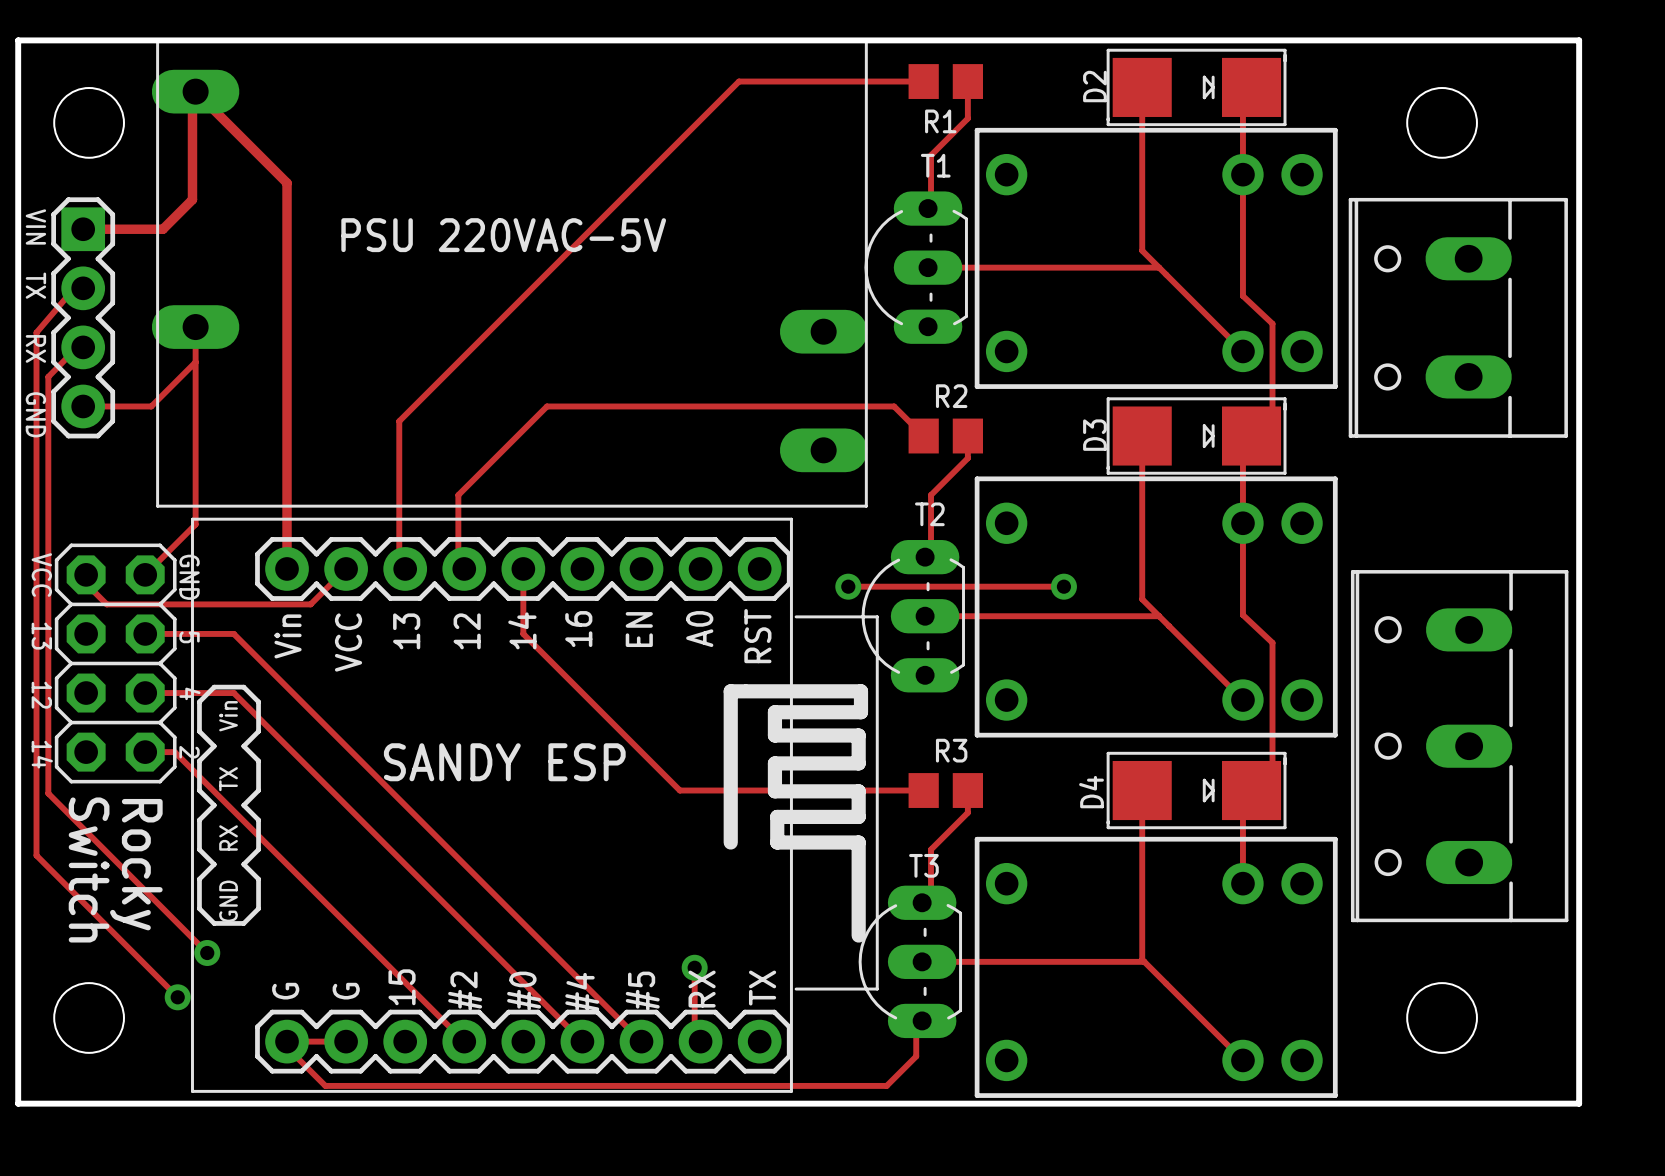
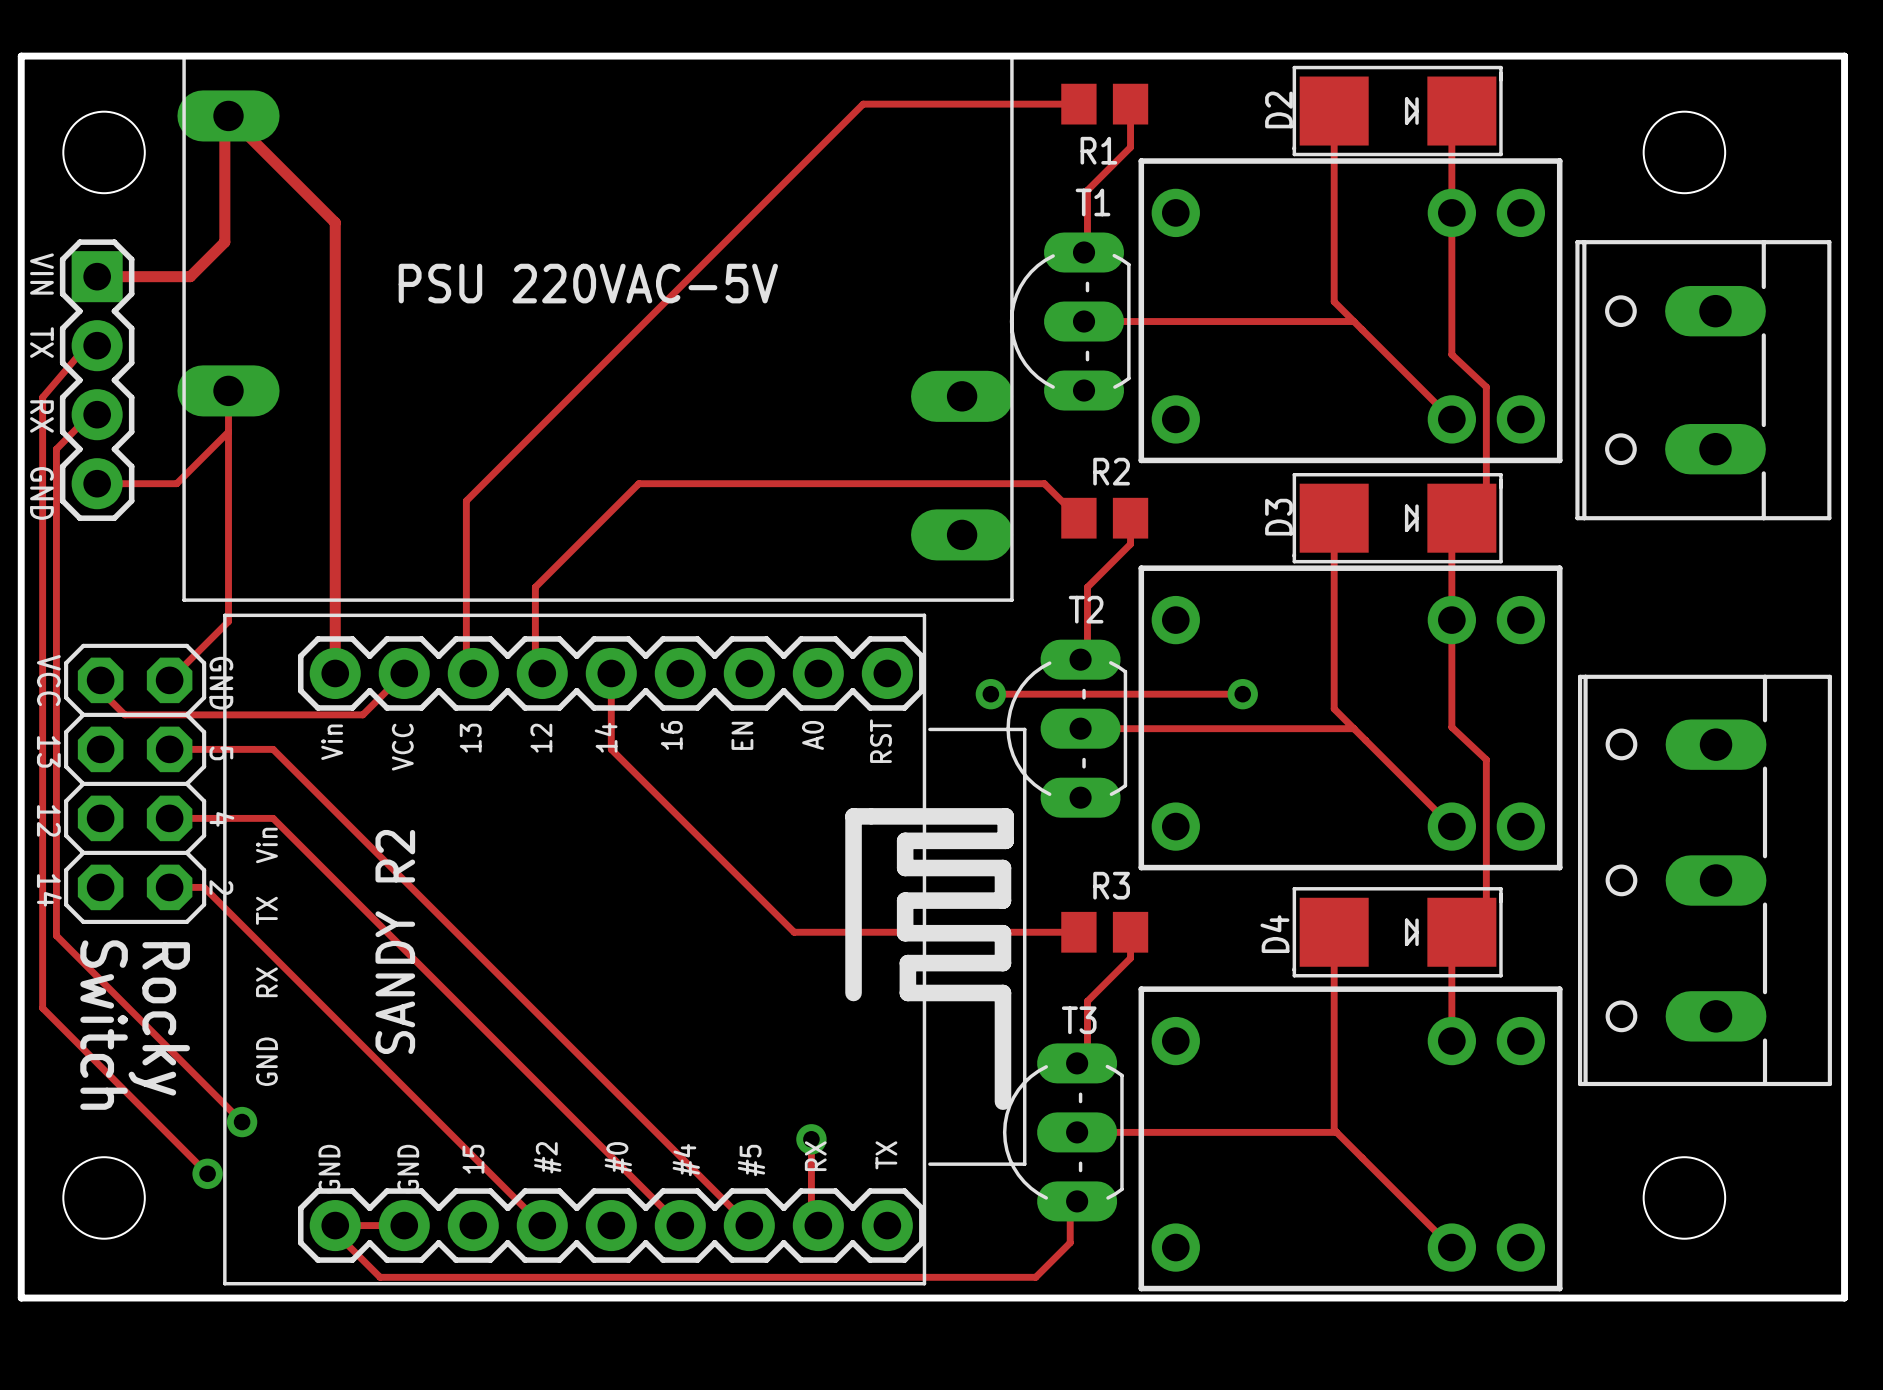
part footprint: [191, 517, 879, 1093] -> [223, 613, 1027, 1286]

